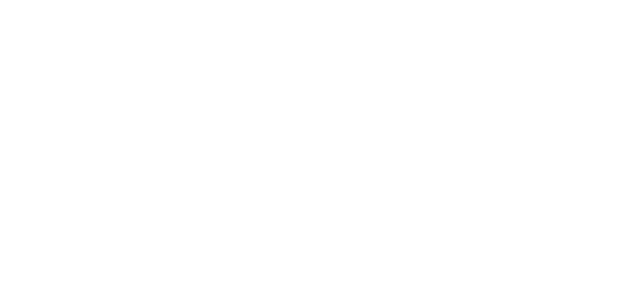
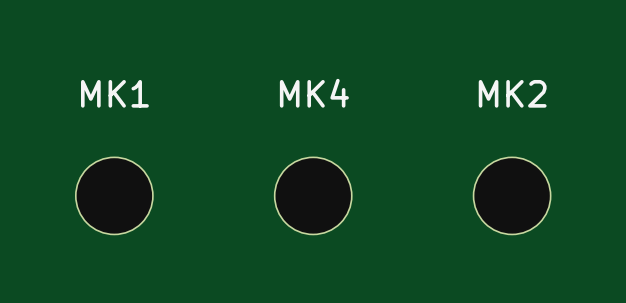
MK1: none -> (114, 195)
MK4: none -> (313, 195)
MK2: none -> (512, 195)

